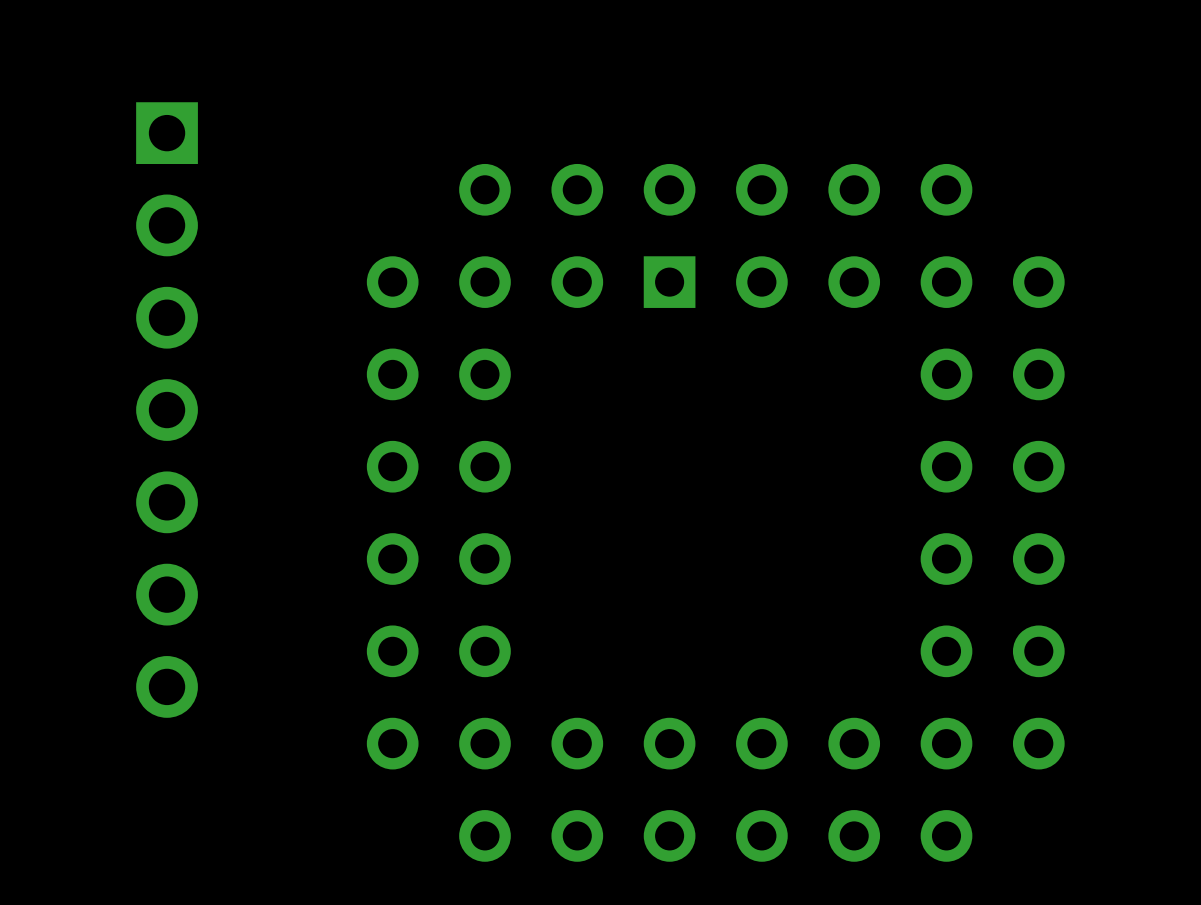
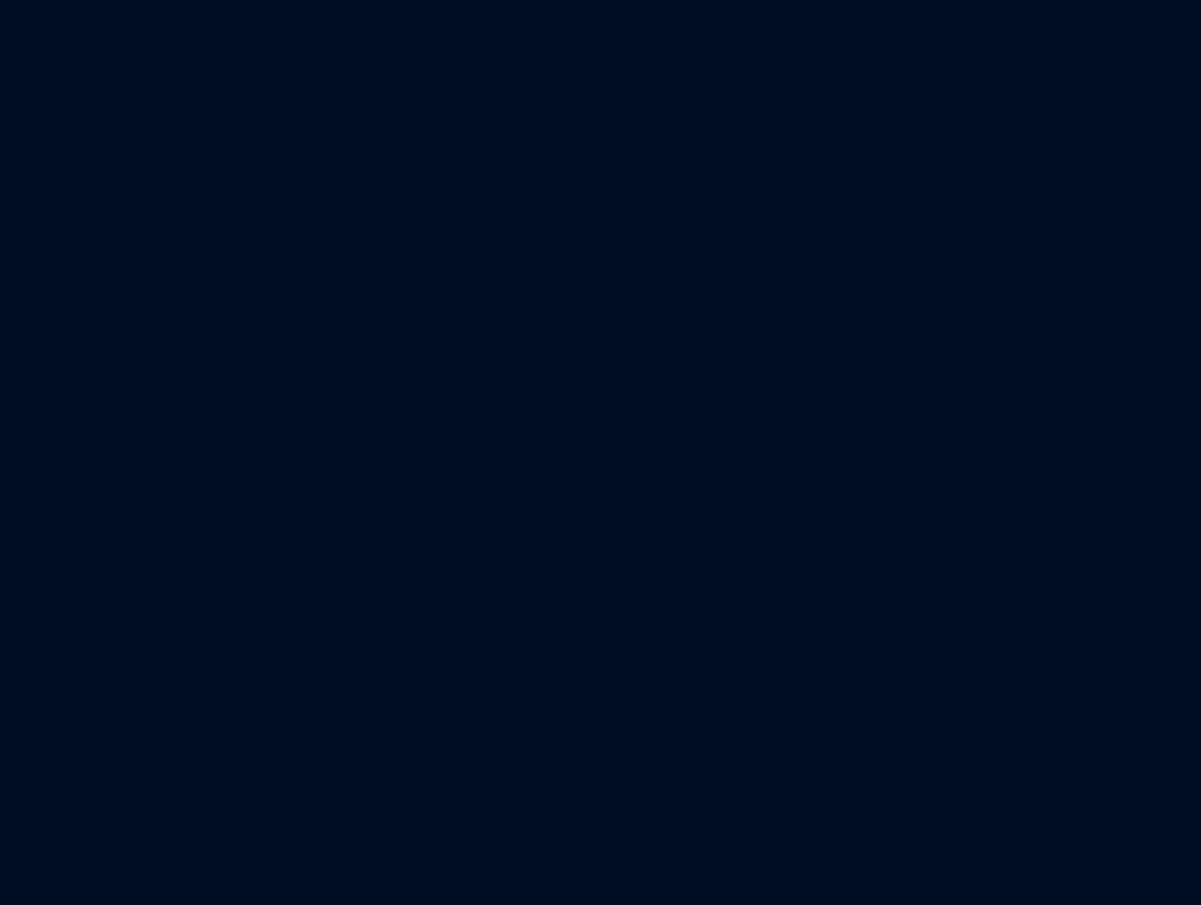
part: (167, 410) -> none
part: (715, 512) -> none

